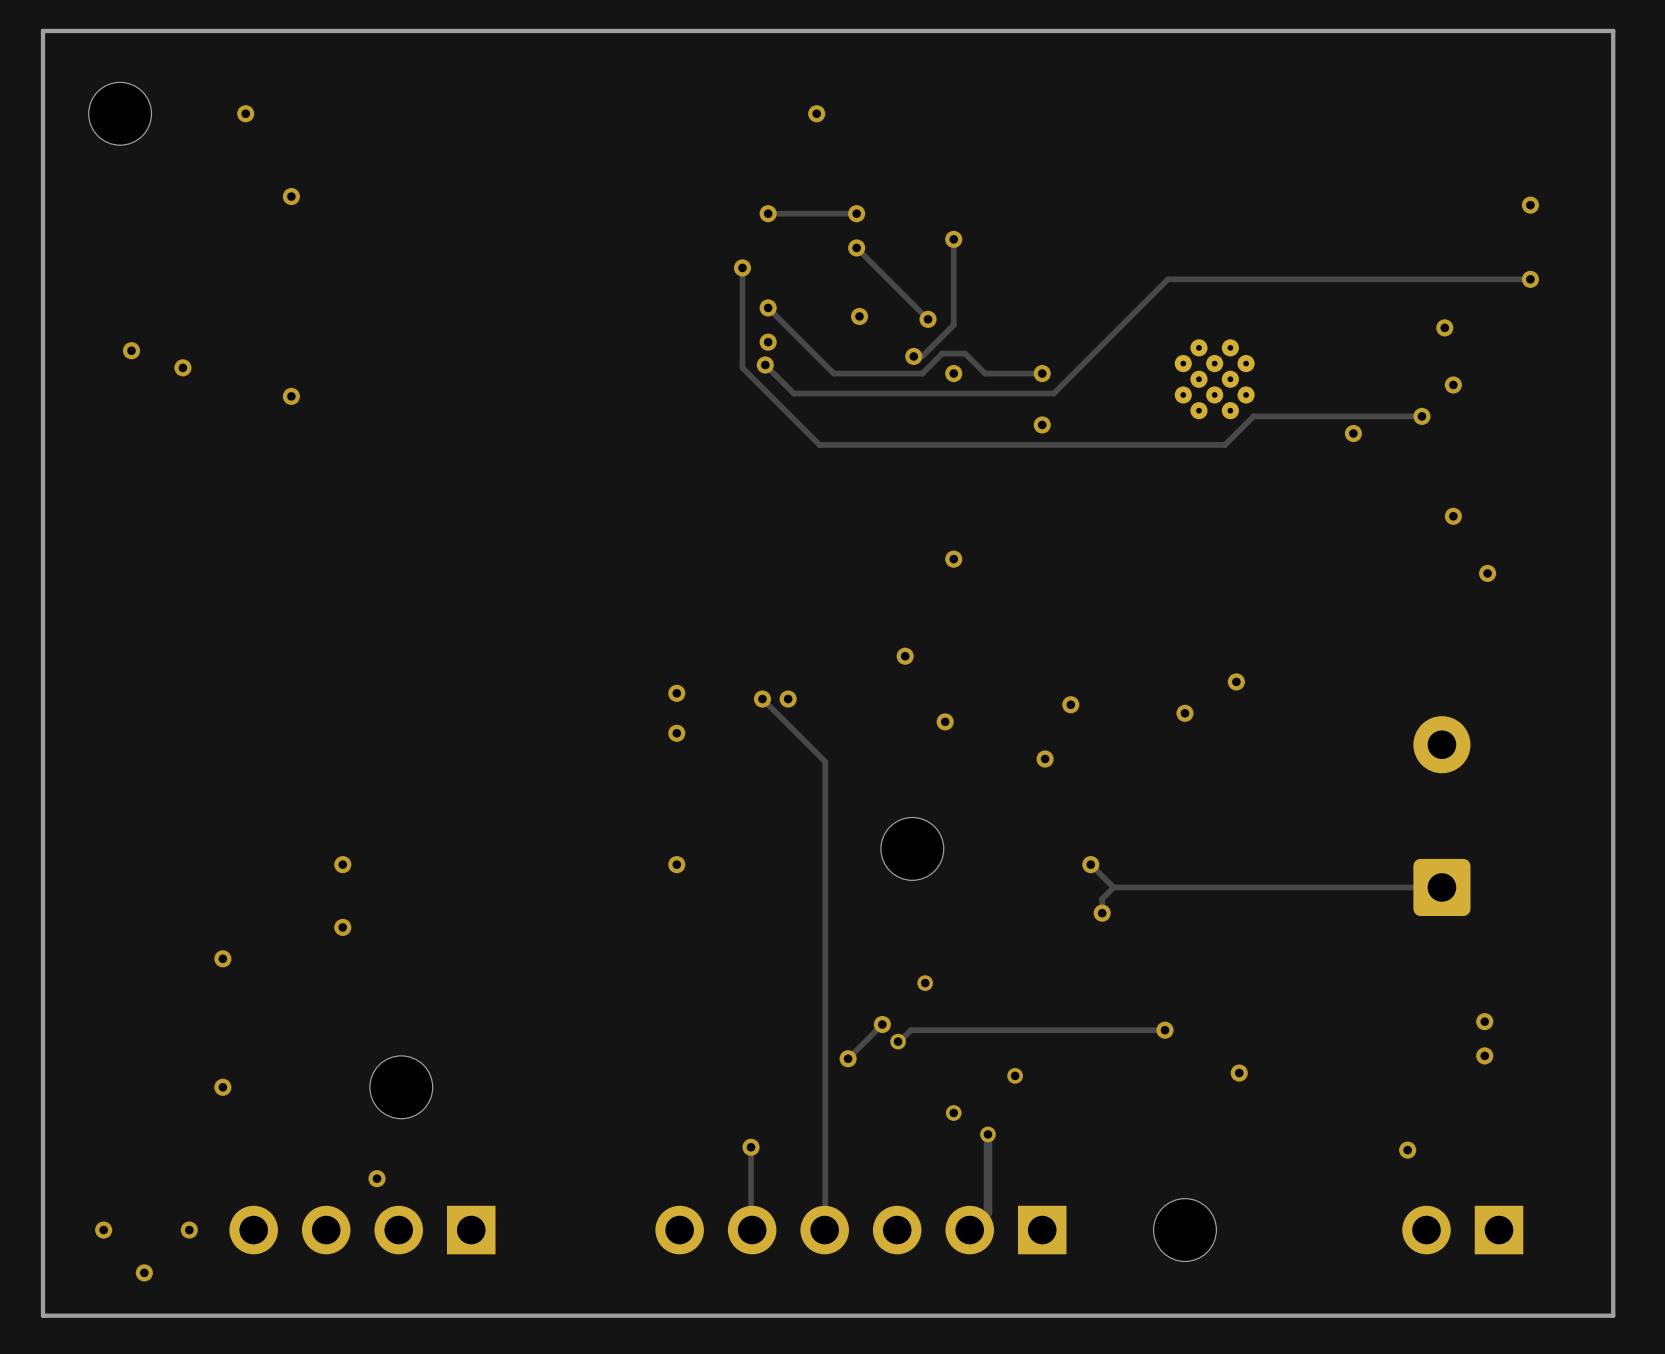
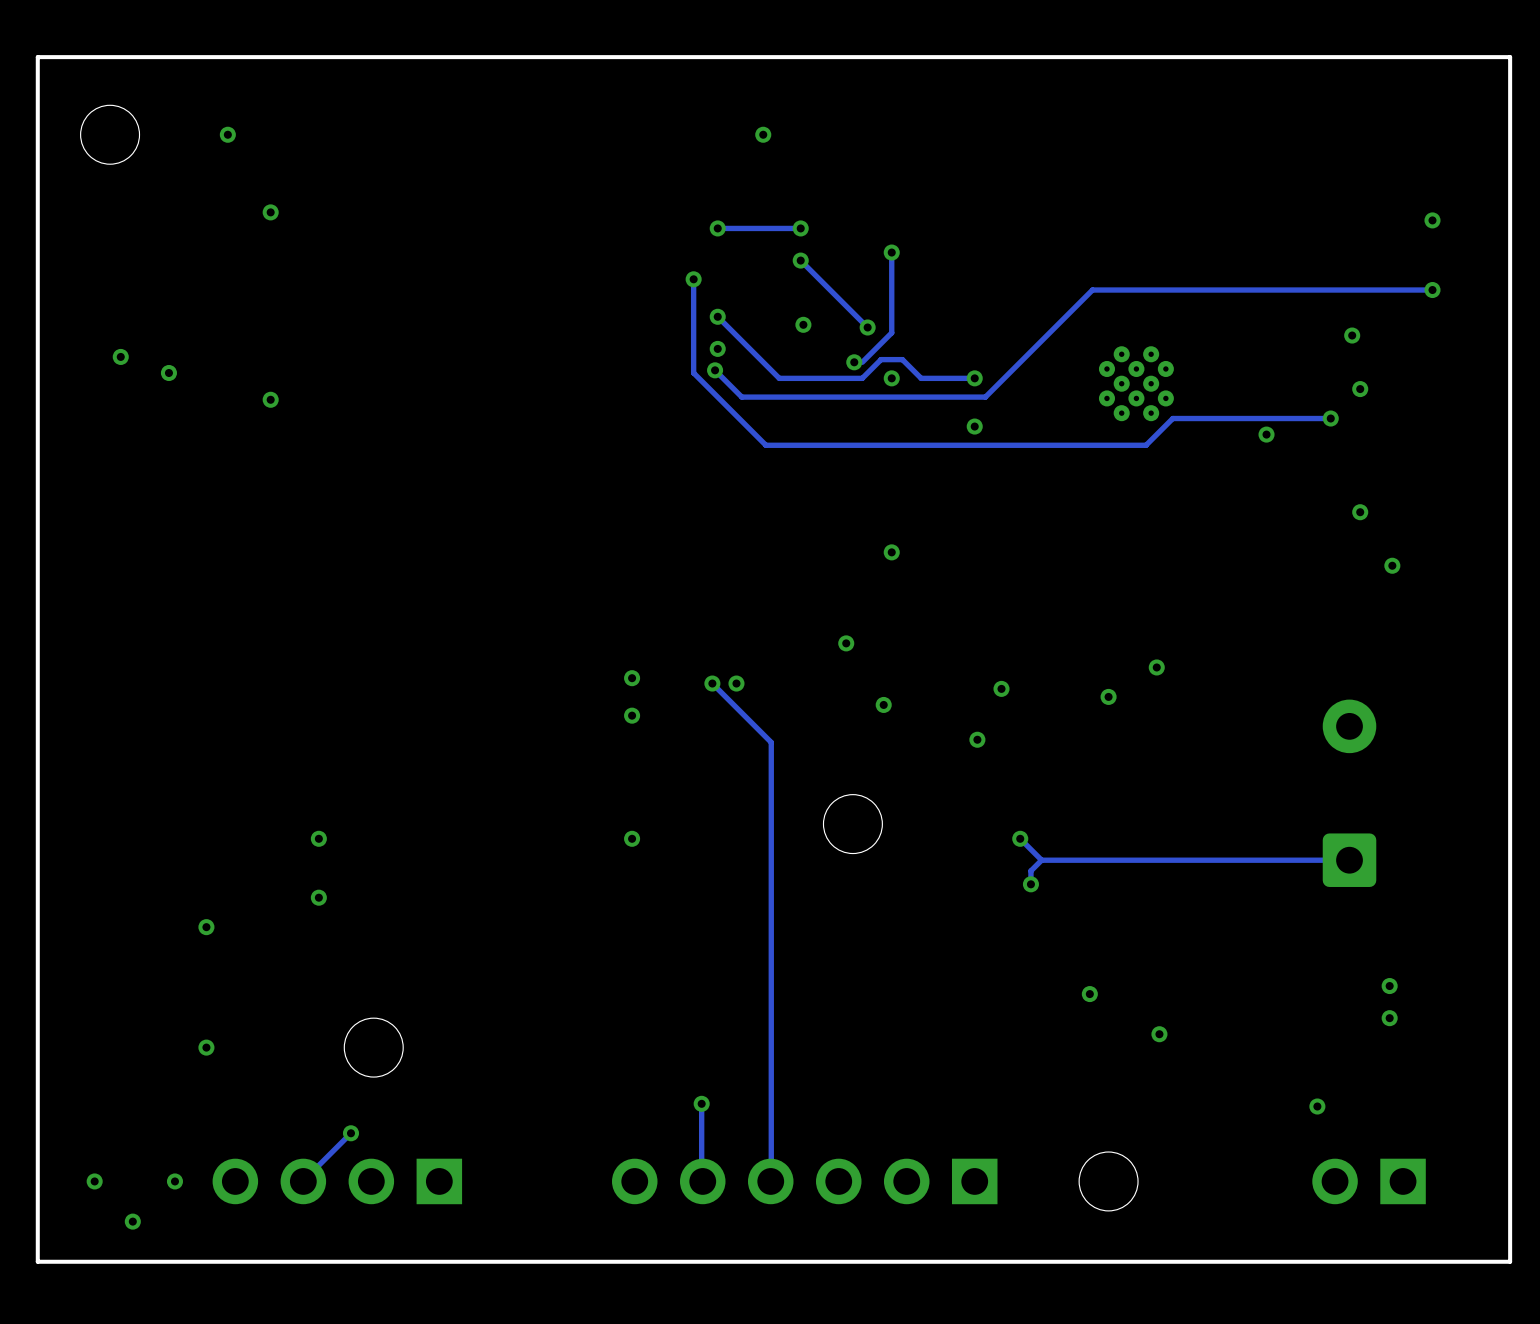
via: (925, 983) -> none
track: (882, 1024) (848, 1058) -> none
via: (882, 1024) -> none
track: (1165, 1030) (910, 1030) (899, 1041) -> none
via: (898, 1041) -> none
via: (848, 1058) -> none
via: (1015, 1075) -> none
via: (953, 1113) -> none
via: (987, 1134) -> none
track: (987, 1135) (987, 1212) (969, 1230) -> none
track: none -> (350, 1133) (302, 1181)

